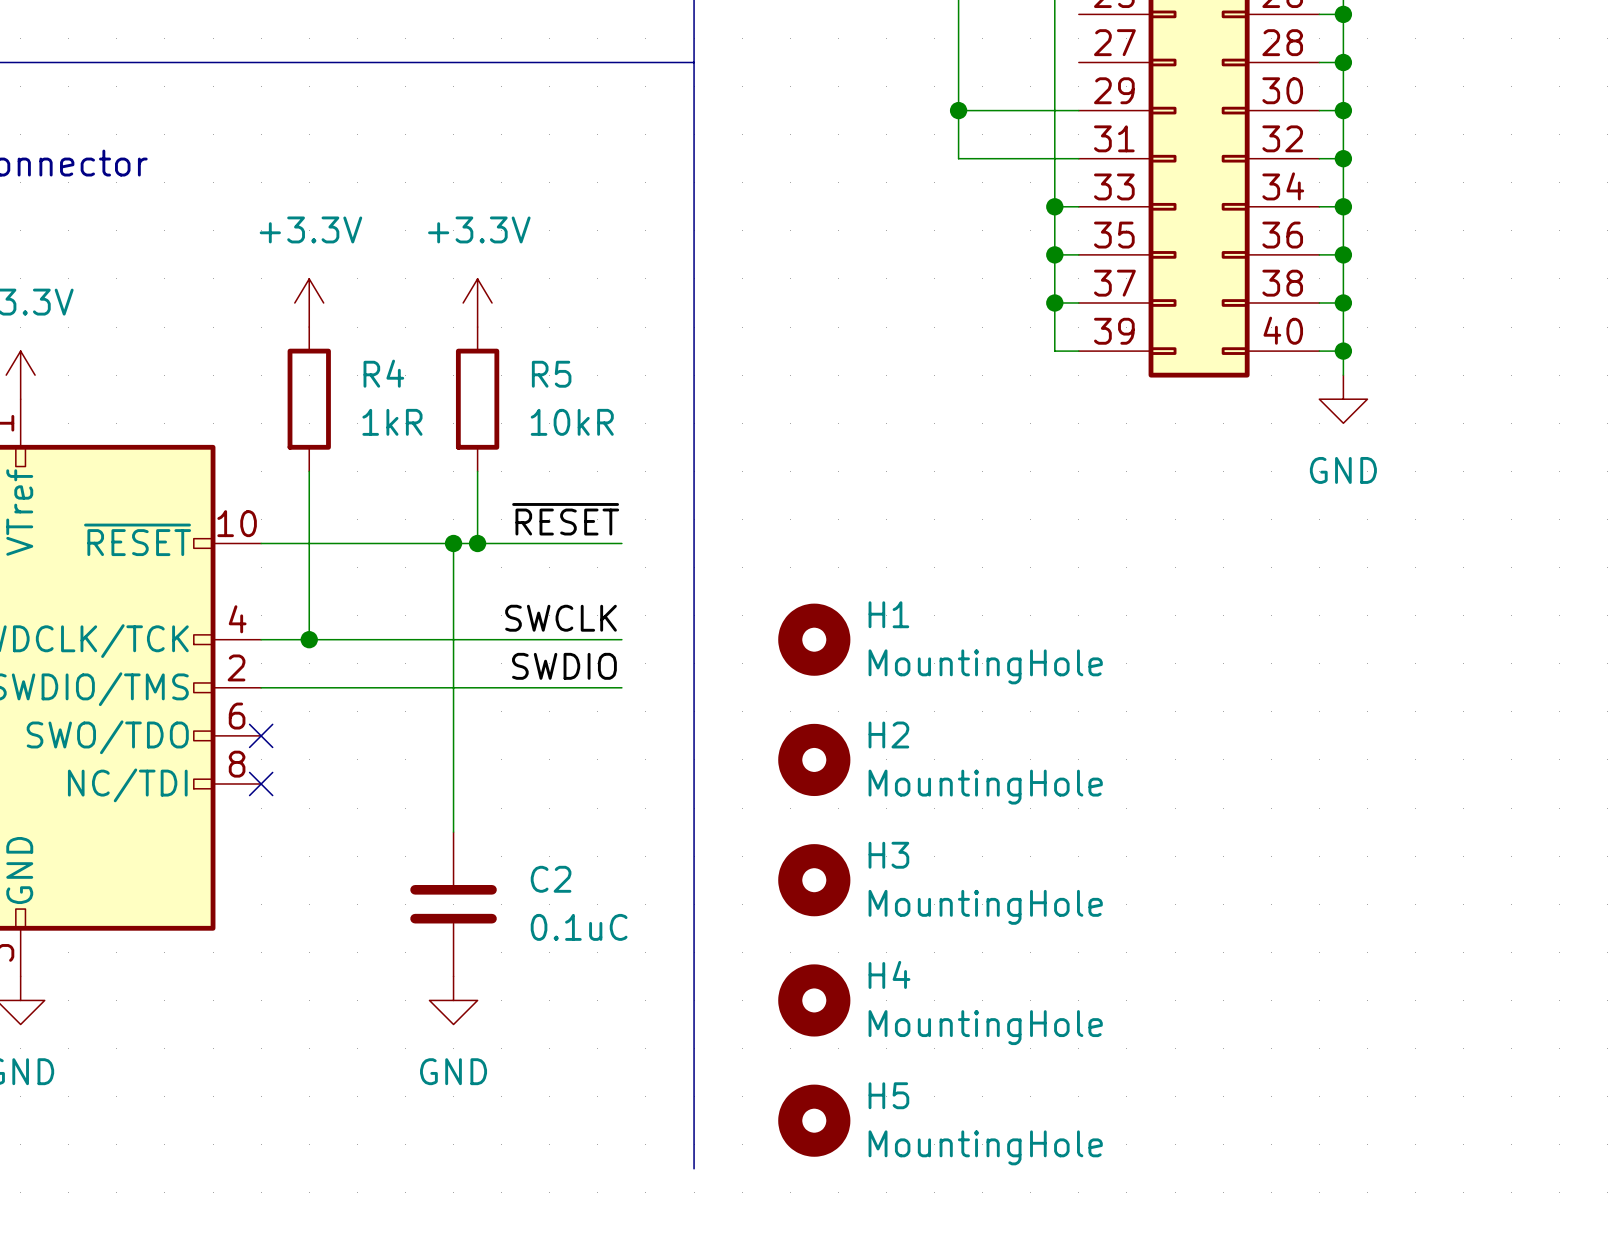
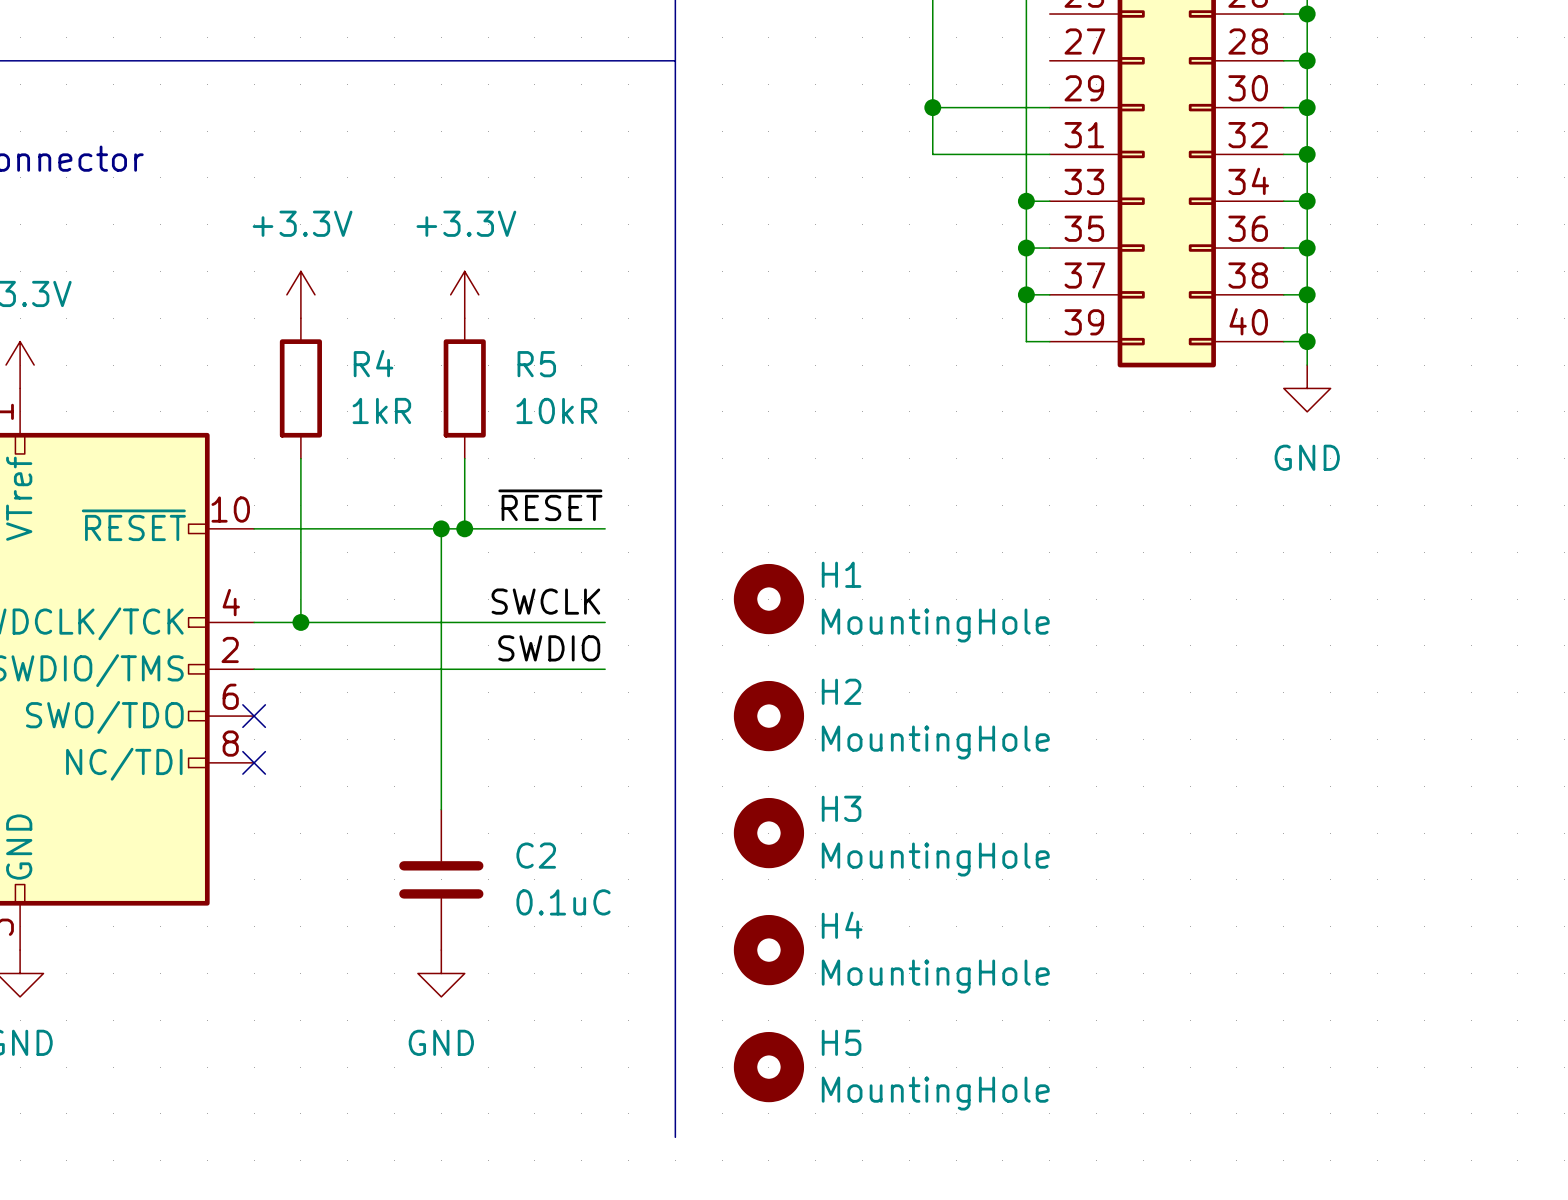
H1 position: (814, 639) -> (768, 599)
H2 position: (814, 759) -> (768, 716)
H3 position: (814, 880) -> (768, 833)
H4 position: (814, 1000) -> (768, 950)
H5 position: (814, 1120) -> (768, 1067)

